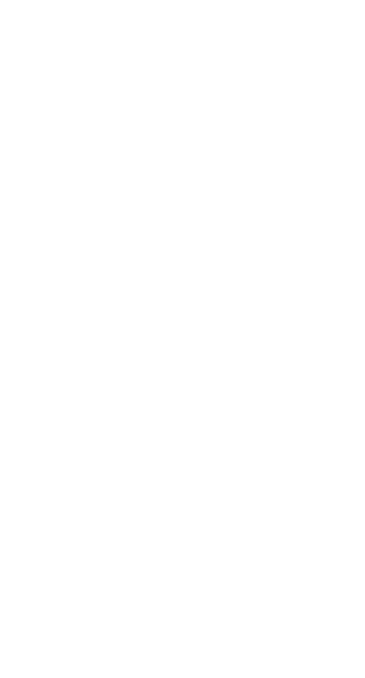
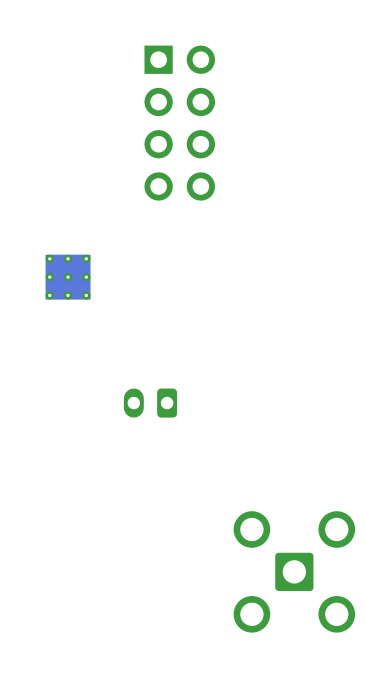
part: none -> (179, 123)
part: none -> (68, 277)
part: none -> (150, 403)
part: none -> (294, 571)

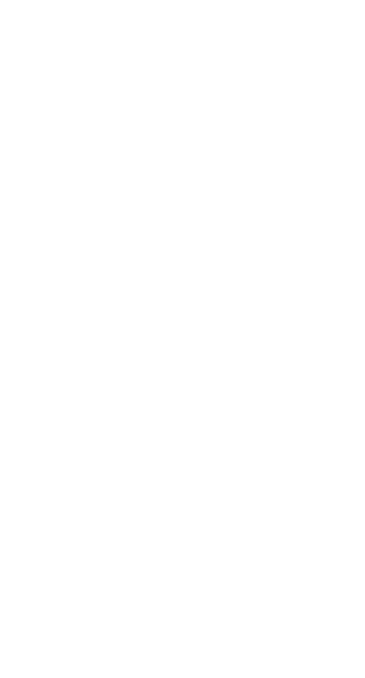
part: (179, 123) -> none
part: (68, 277) -> none
part: (150, 403) -> none
part: (294, 571) -> none

